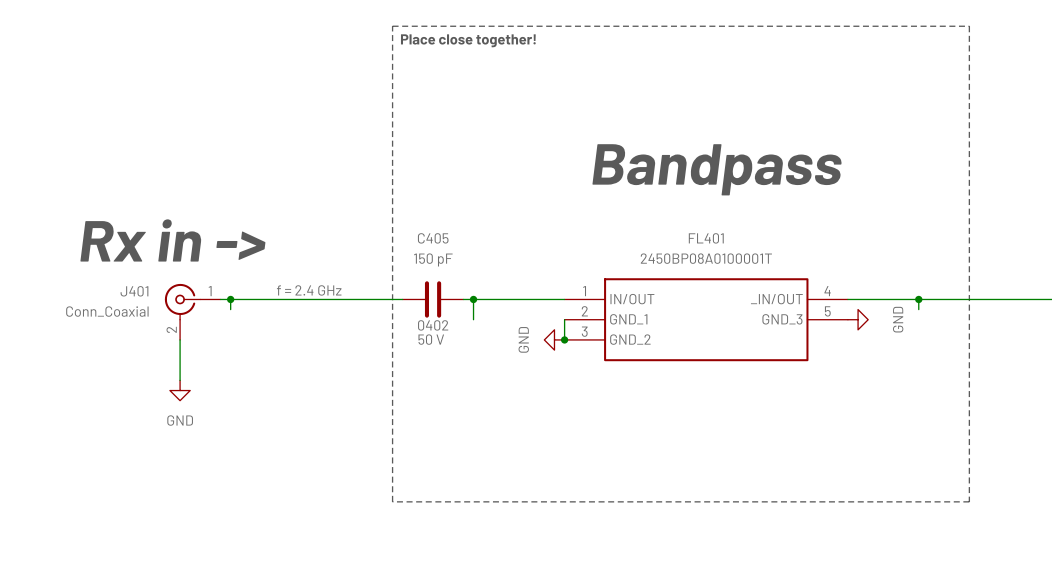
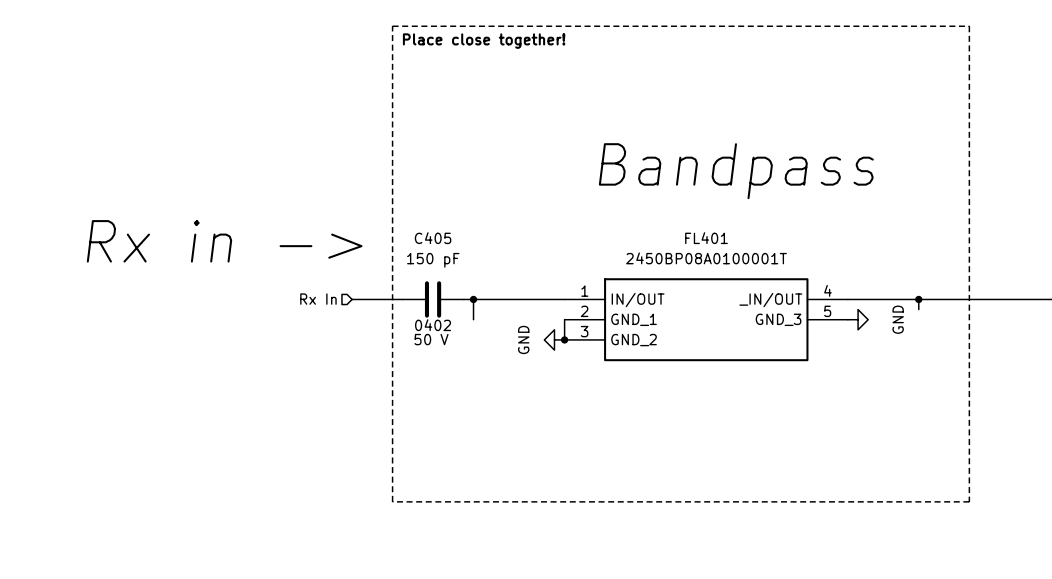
label: f = 2.4 GHz (309, 290) -> none
wire: (220, 299) (352, 299) -> none
wire: (230, 299) (230, 309) -> none
junction: (230, 299) -> none
hierarchical label: none -> Rx In (318, 299)
J401: Conn_Coaxial (192, 311) -> none
wire: (180, 339) (180, 380) -> none
power symbol: GND (180, 390) -> none

